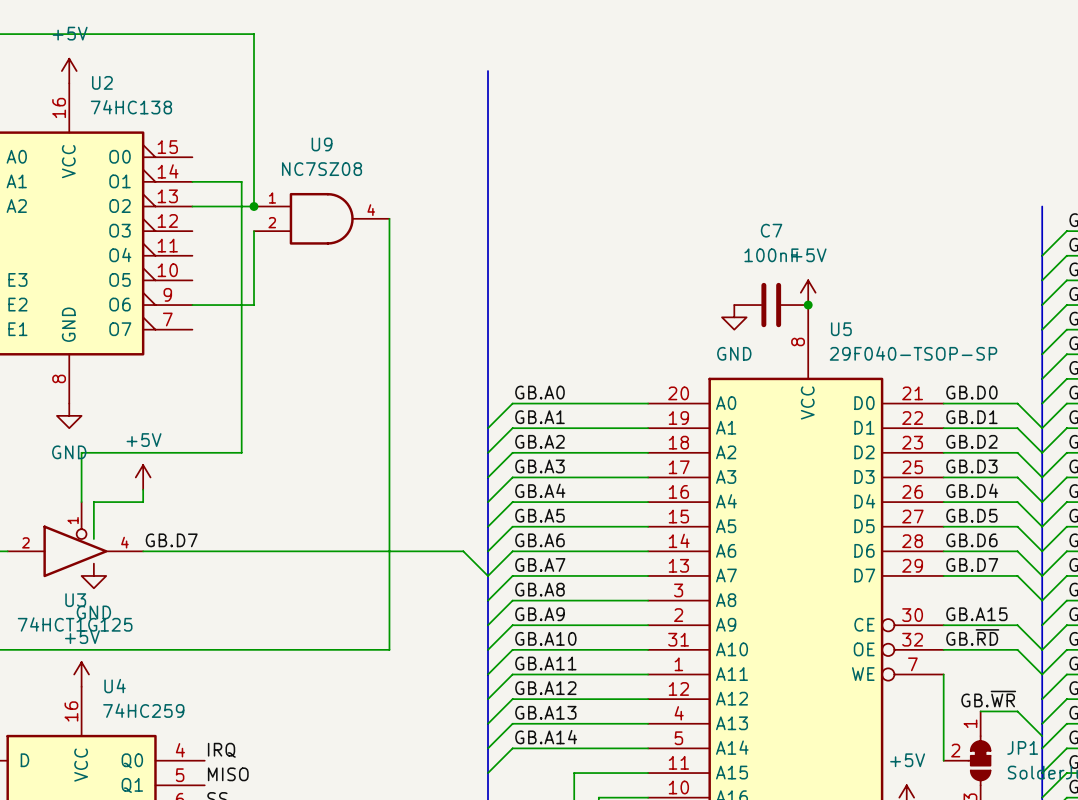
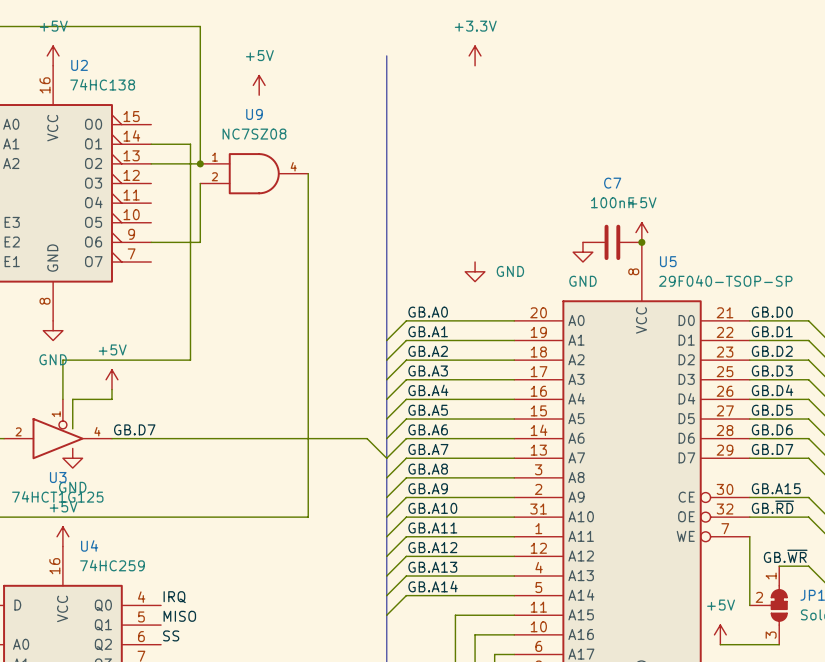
power symbol: none -> +3.3V (475, 55)
power symbol: none -> +5V (259, 85)
power symbol: none -> GND (475, 271)

